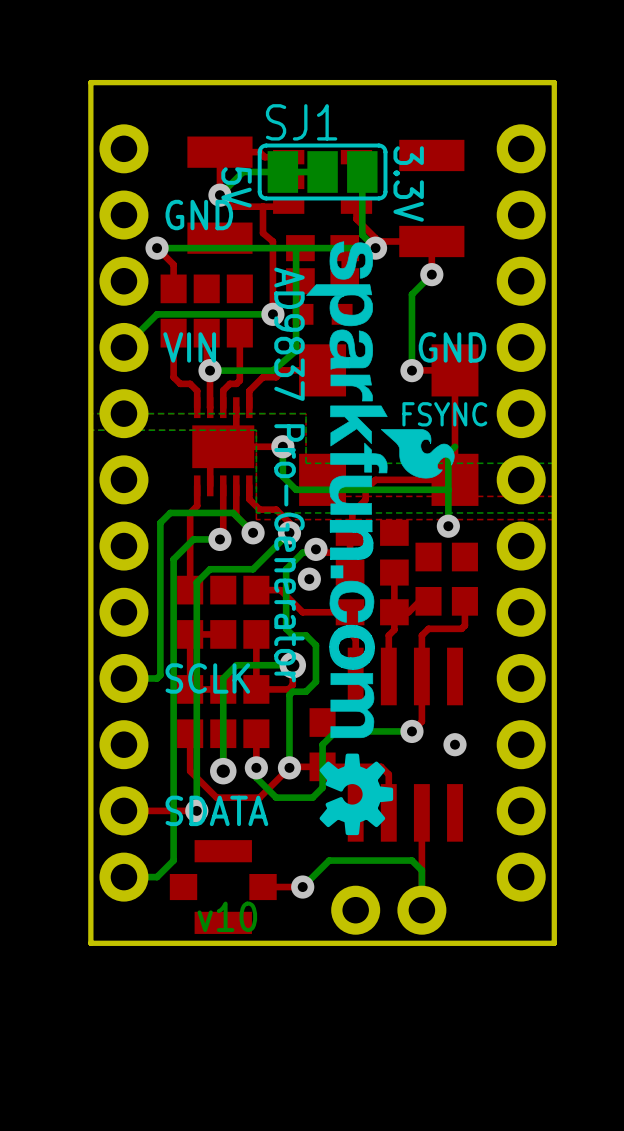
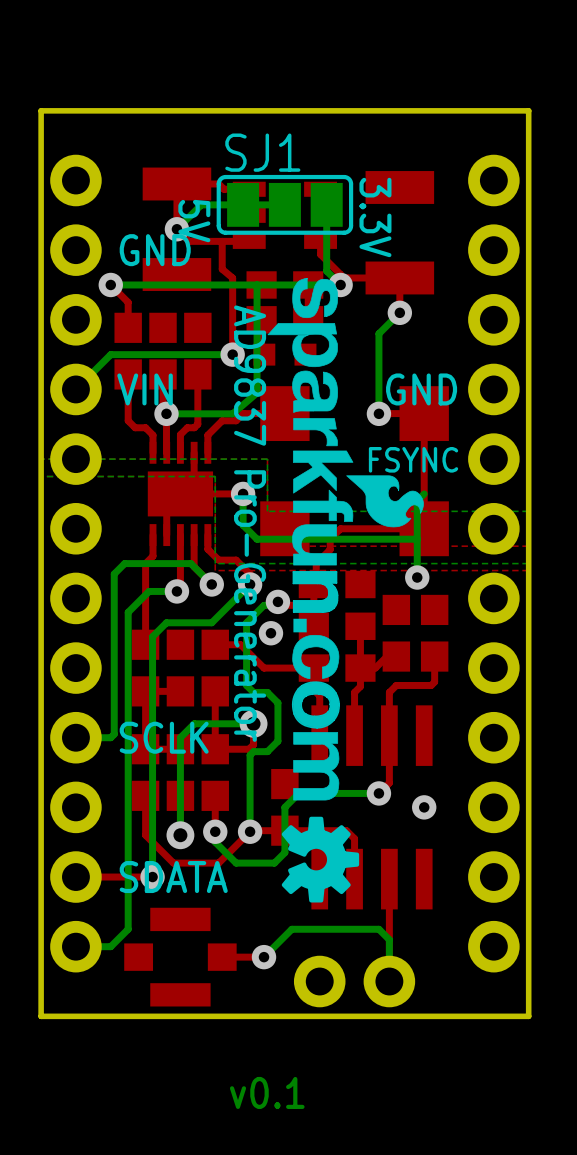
text: v10 (227, 916) -> none
text: none -> v0.1 (267, 1092)

